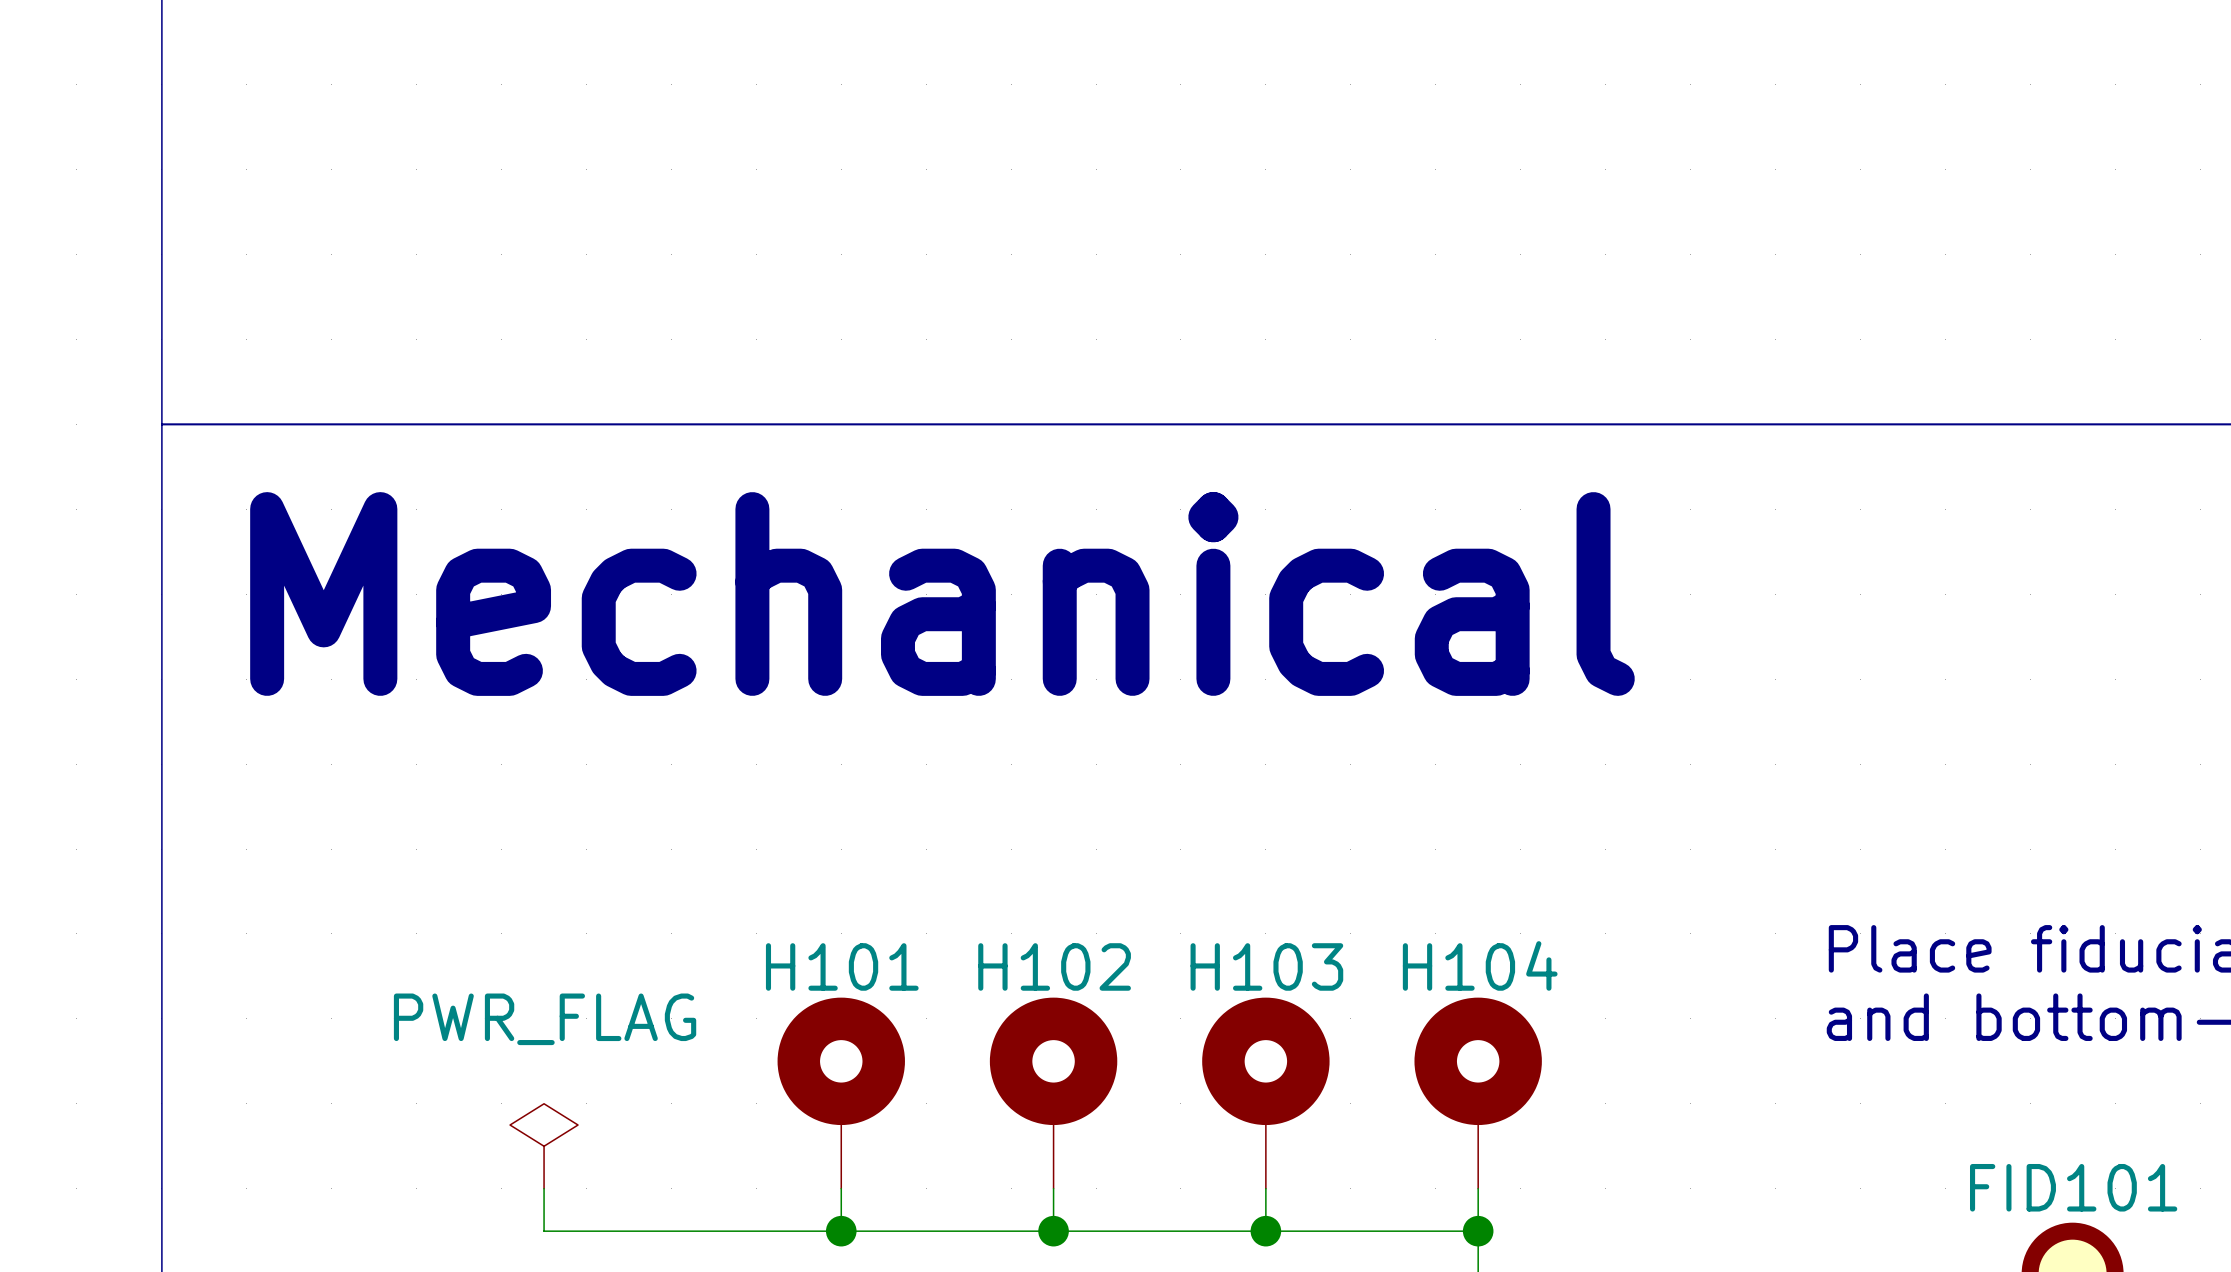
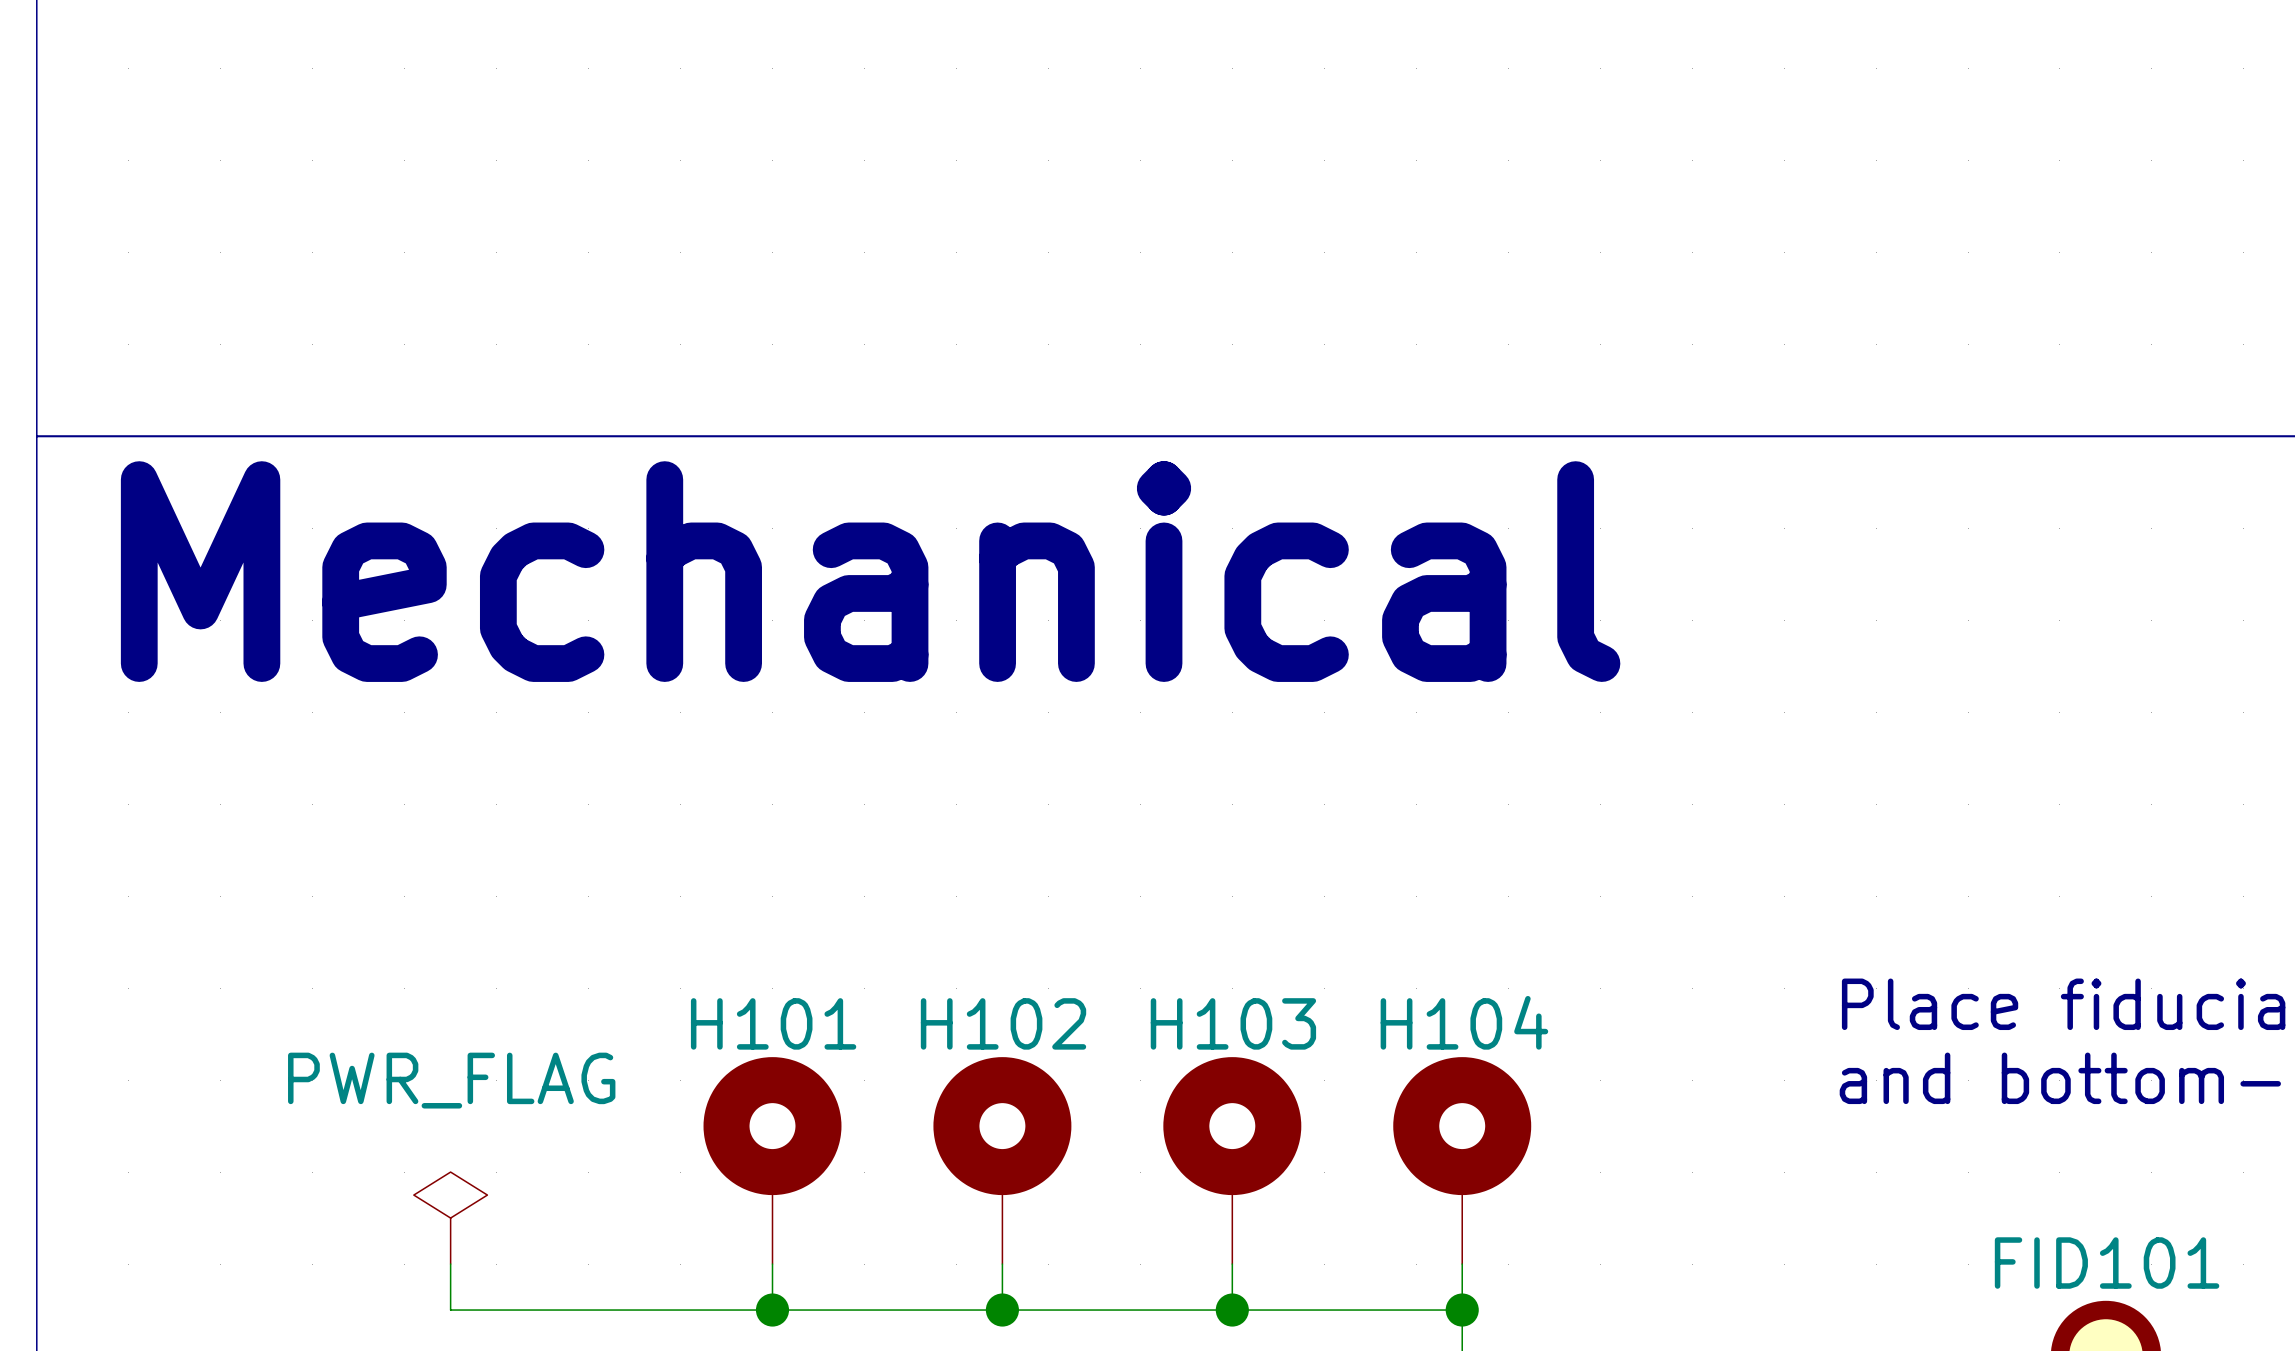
text position: Mechanical (942, 593) -> Mechanical (870, 571)

